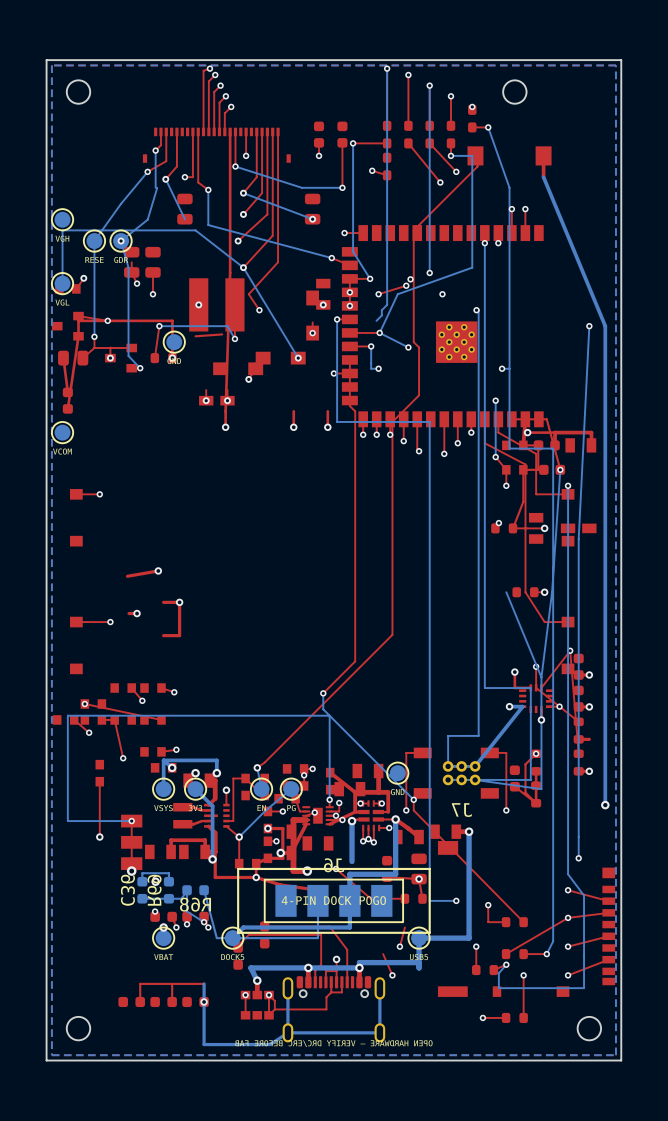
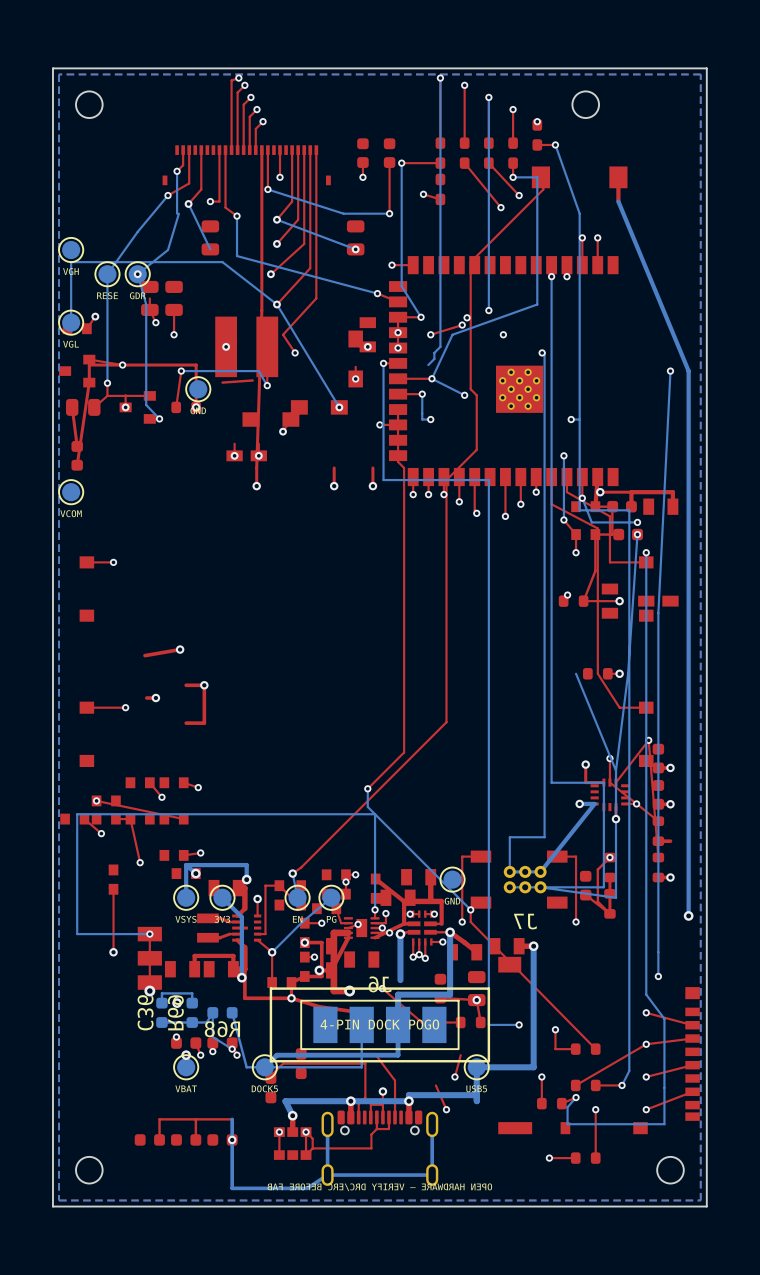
top track: (511, 419) (546, 419) (560, 469) -> (582, 477) (582, 498)
bottom track: none -> (582, 498) (591, 522) (637, 522)
via: none -> (582, 498)
via: none -> (637, 522)
via: (195, 773) -> none

